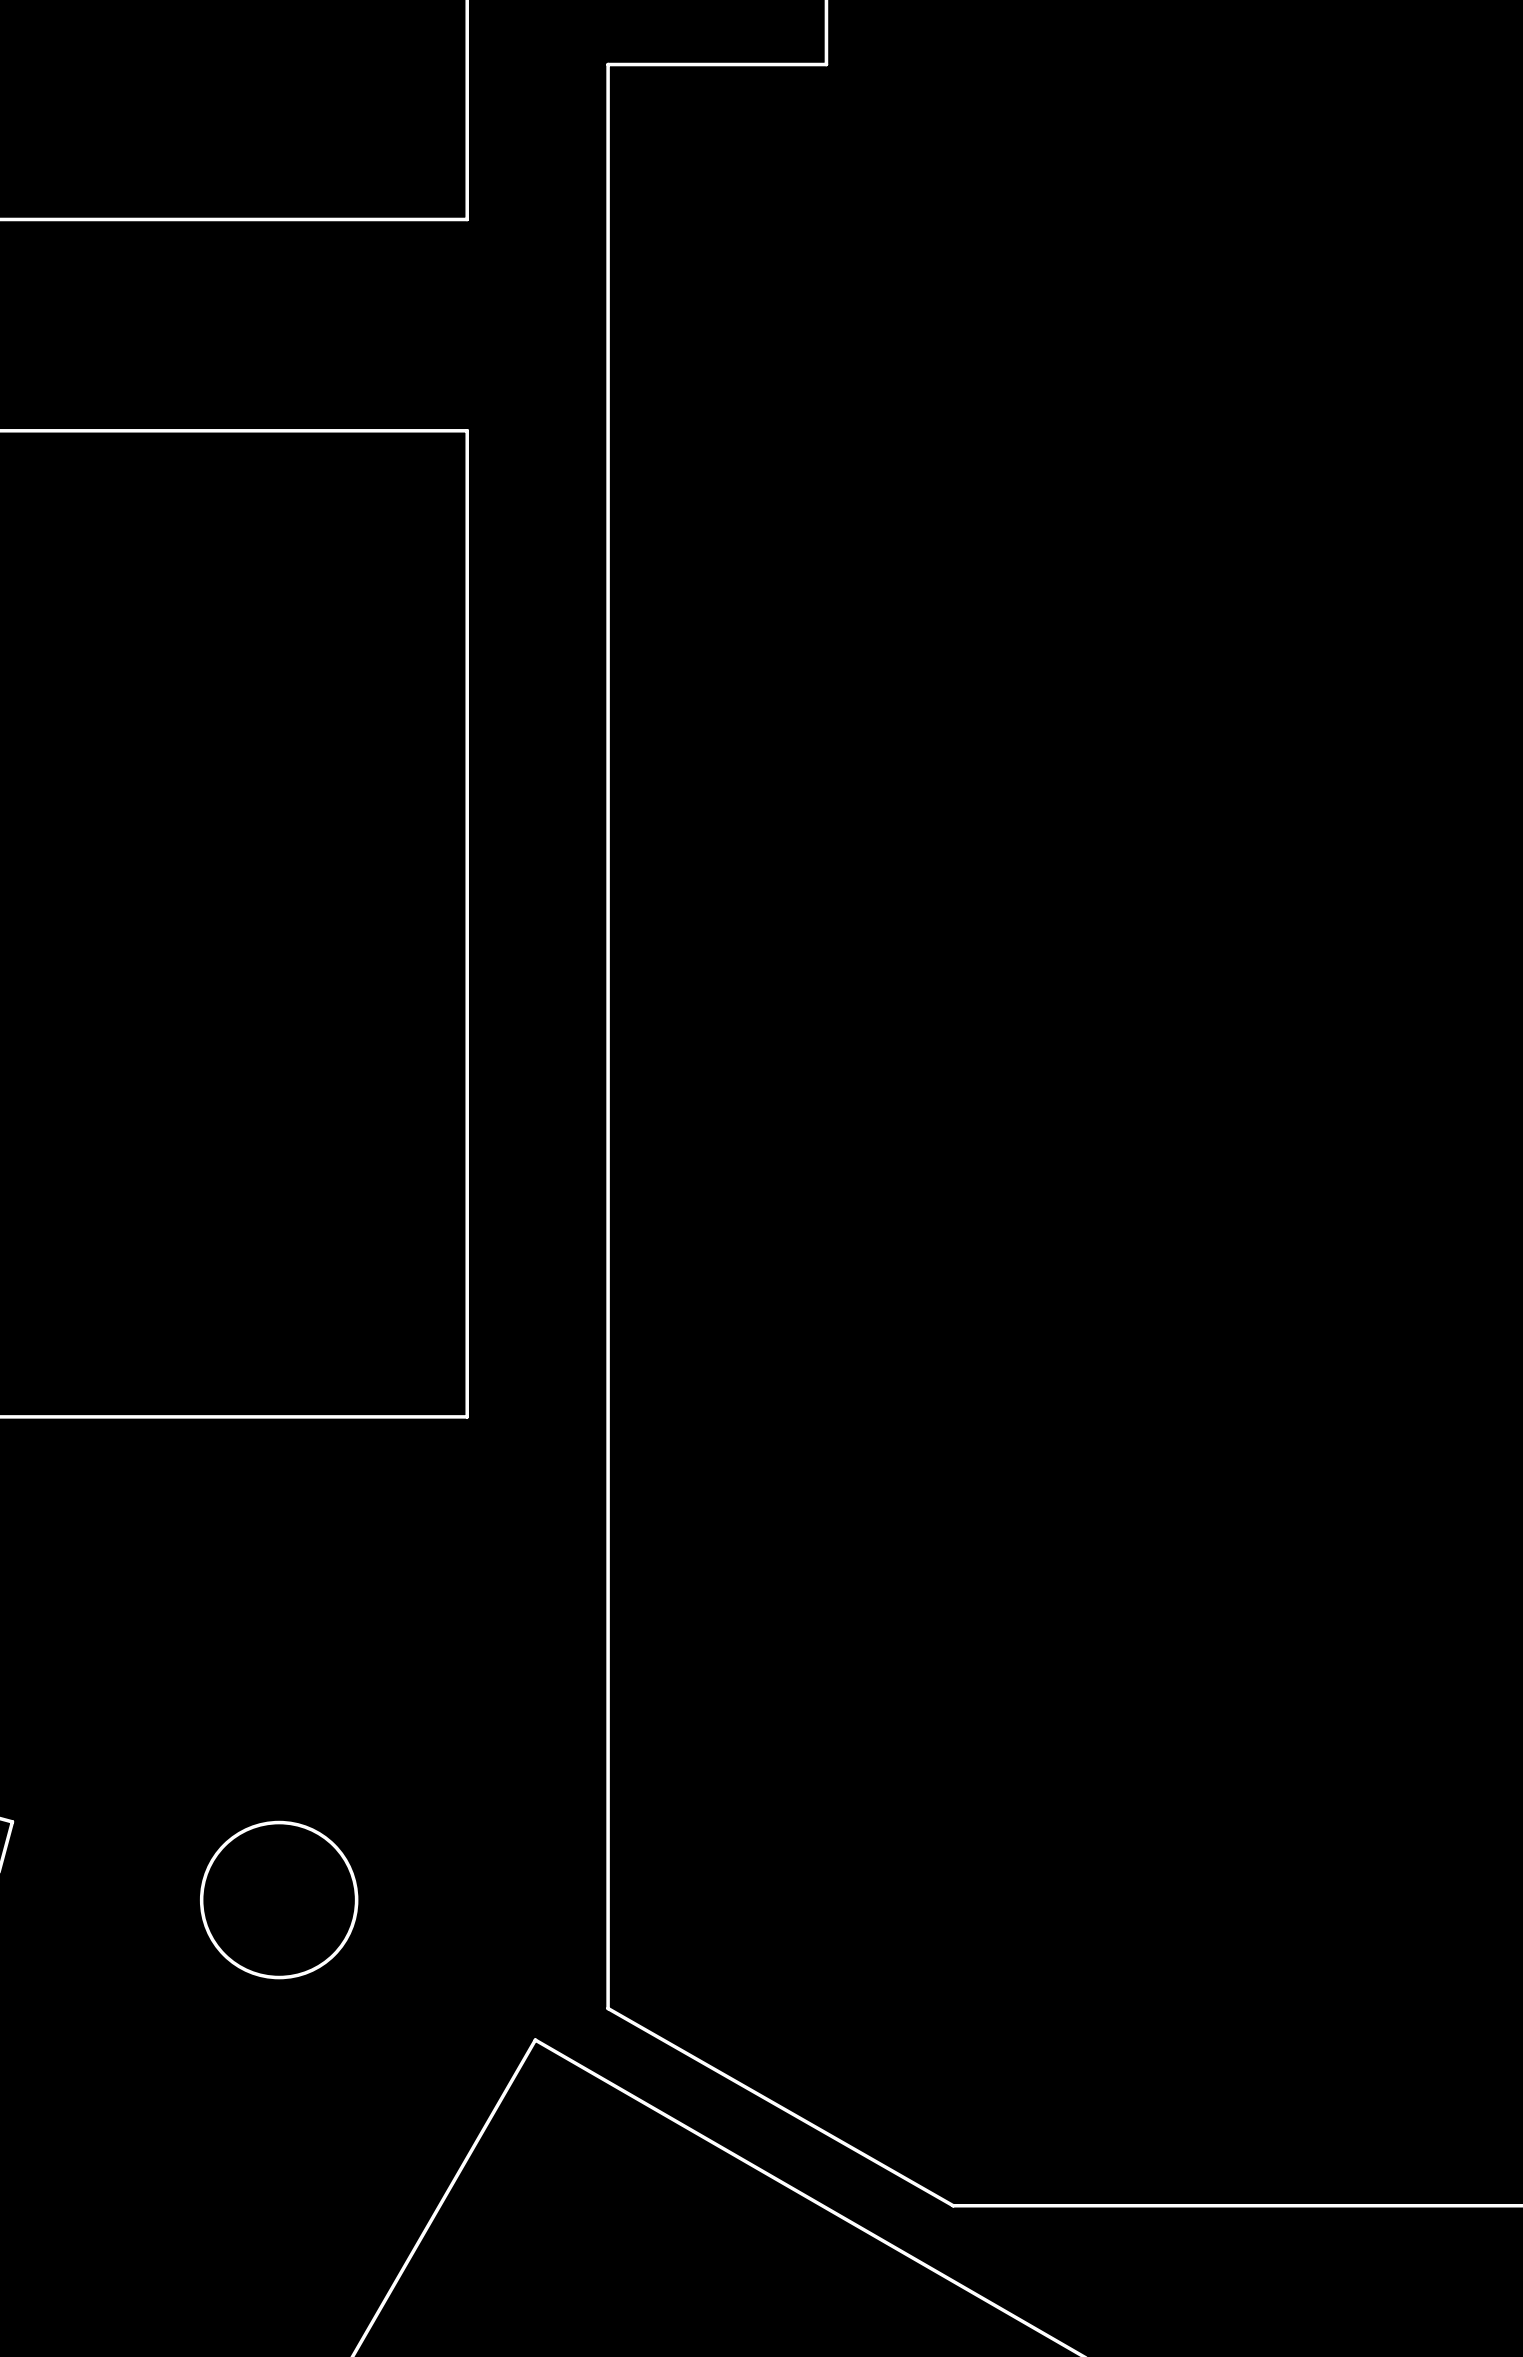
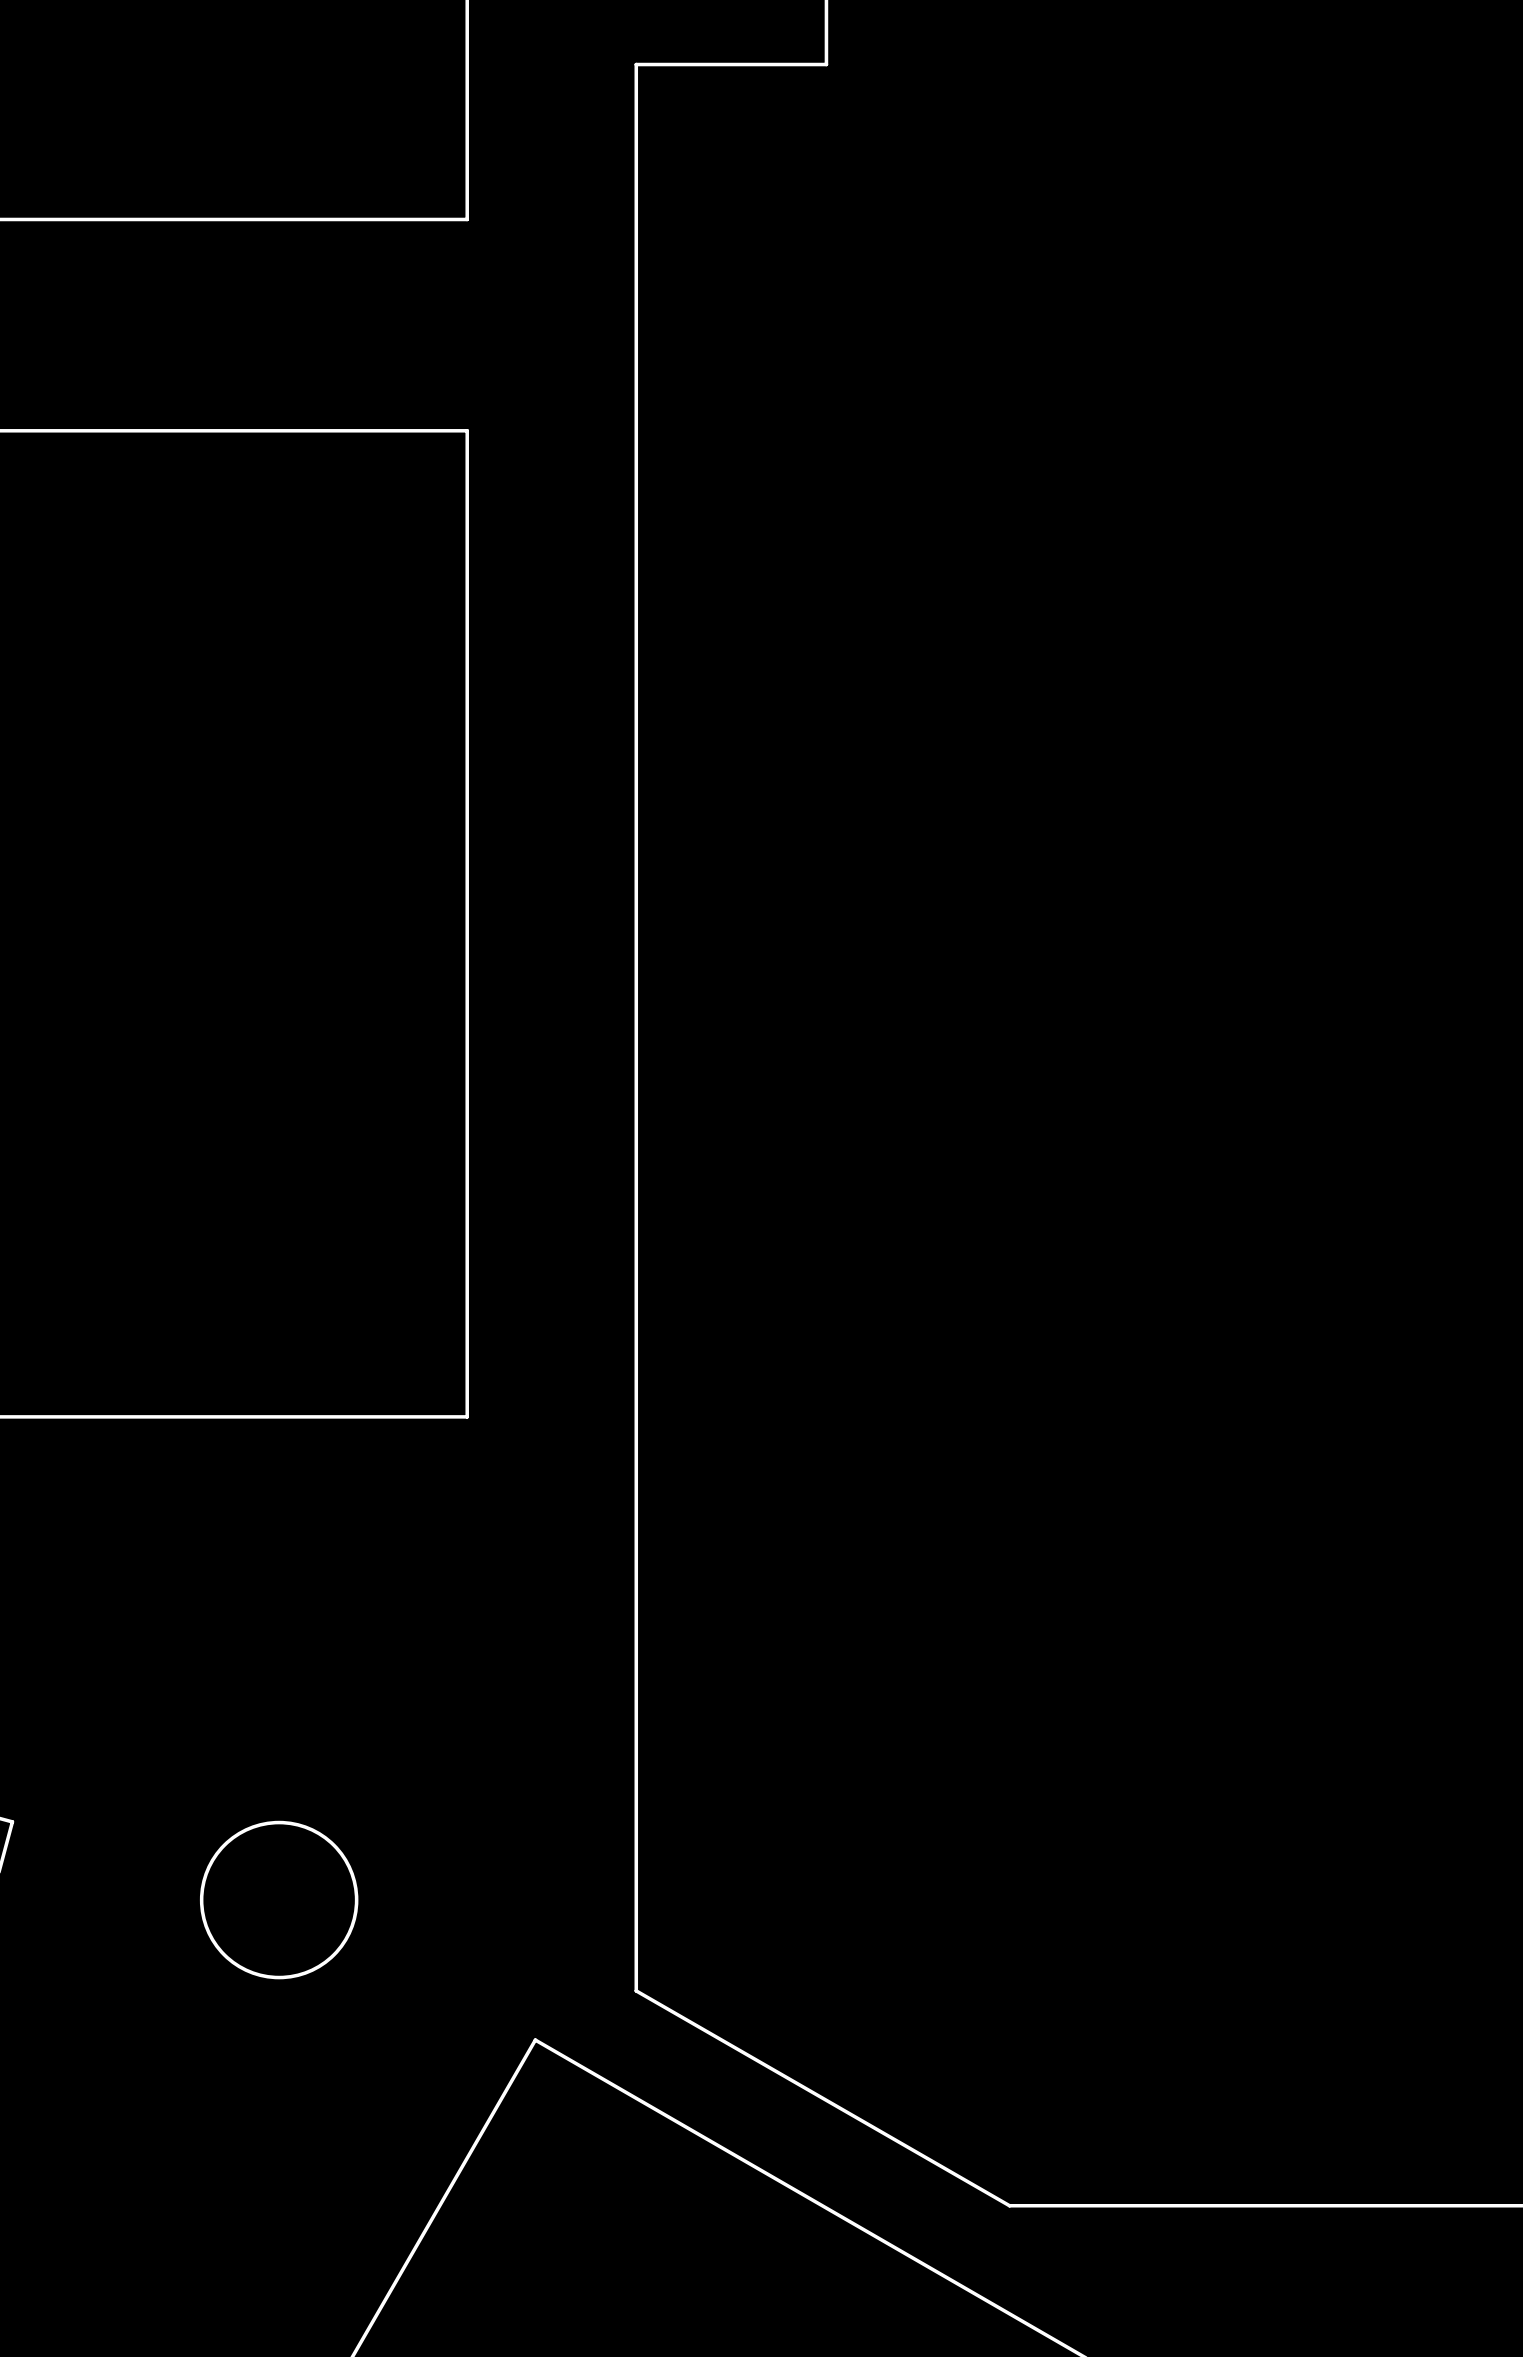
board edge: (636, 64) (608, 64) (608, 2008) (953, 2205) (1009, 2205) -> (636, 64) (636, 1990) (1009, 2205)

